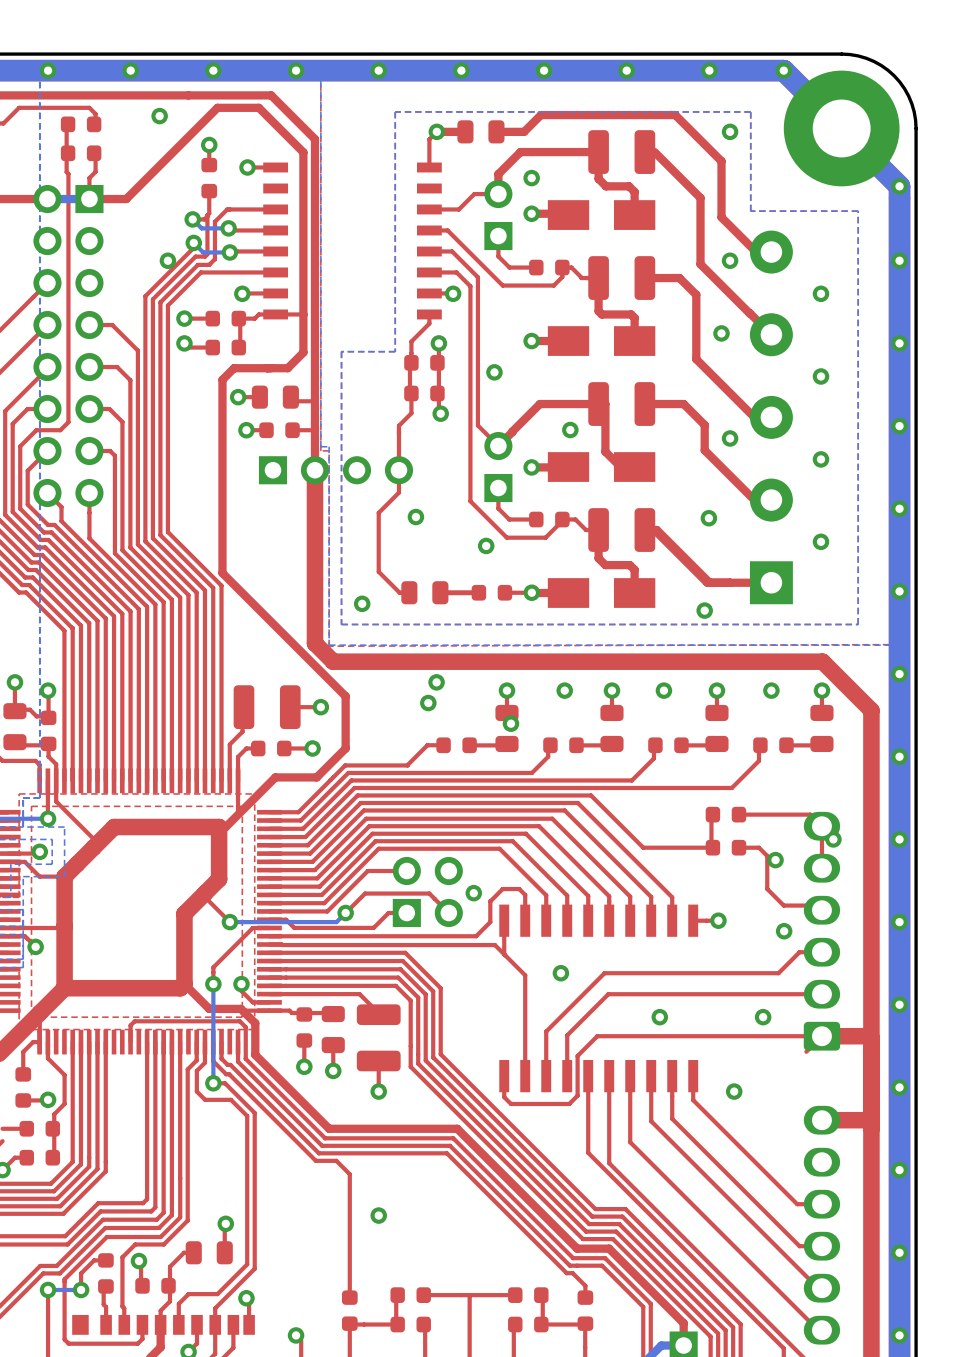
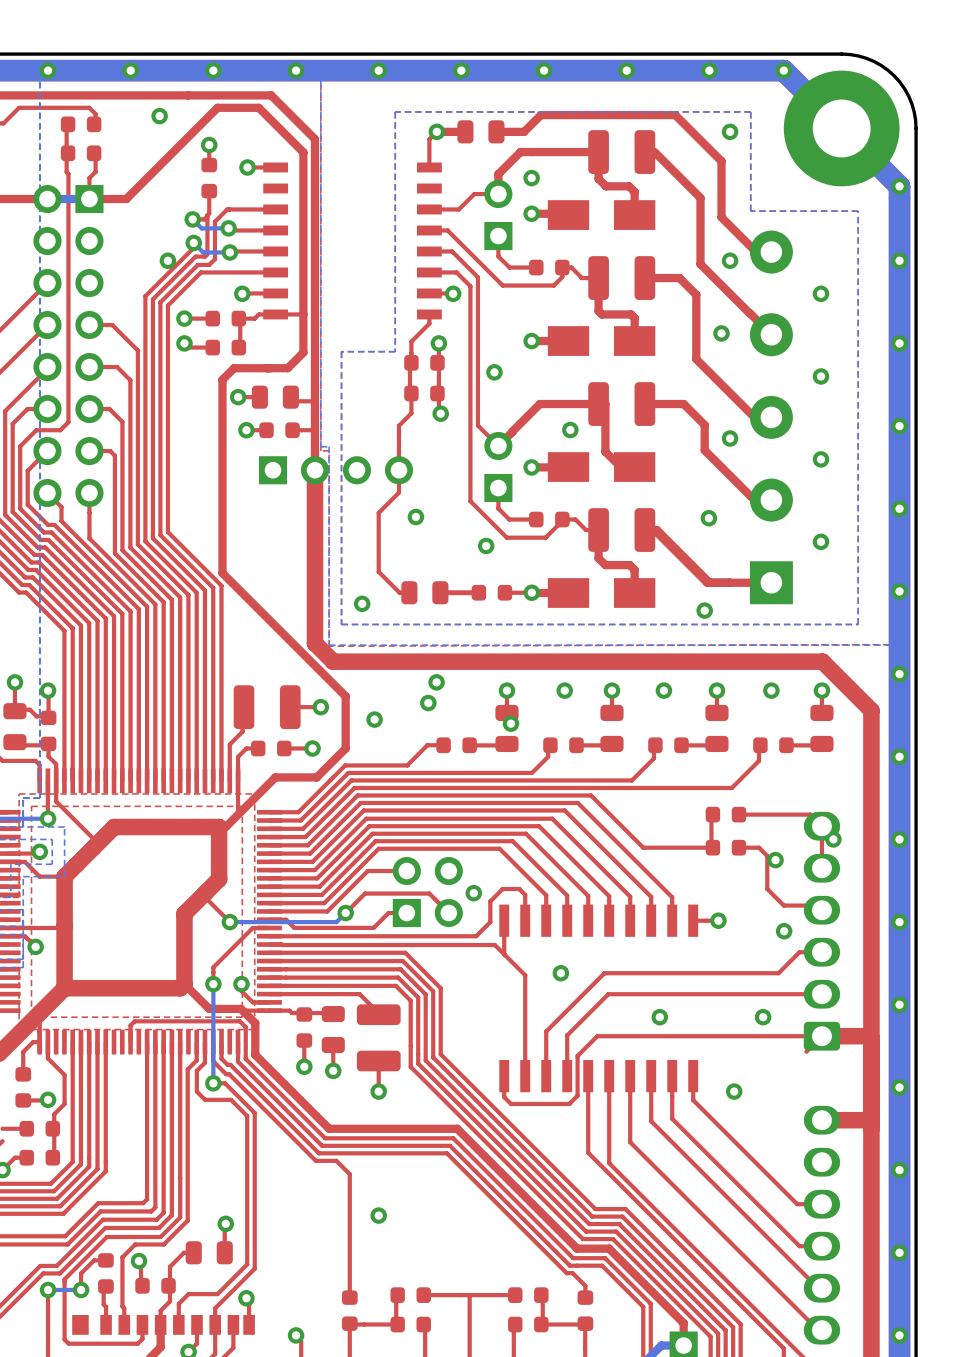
via: none -> (374, 719)

